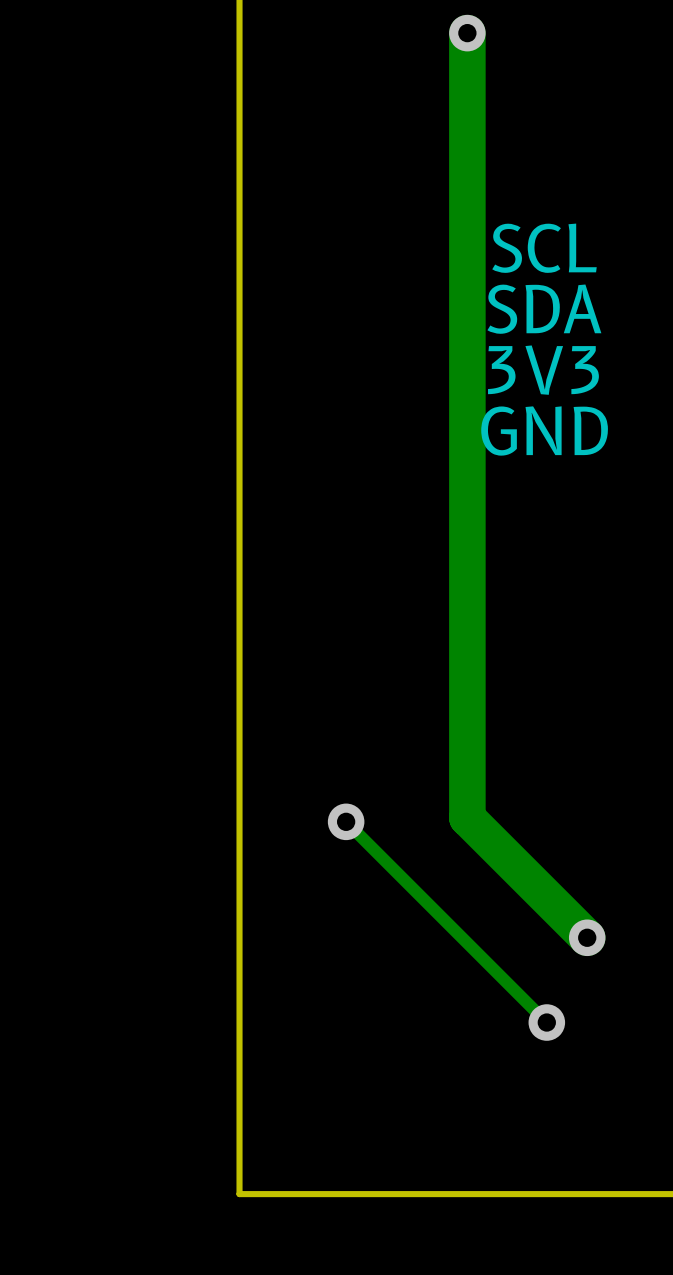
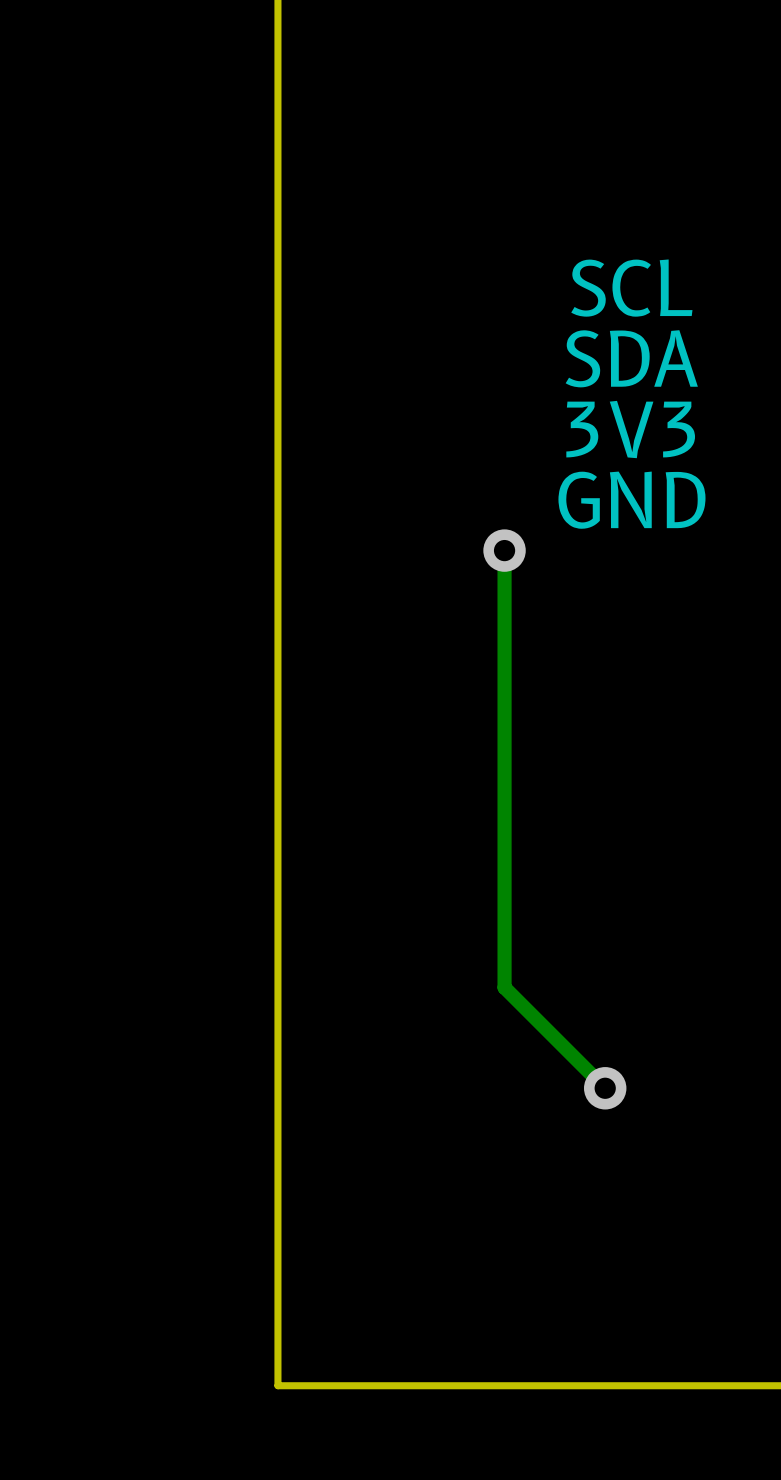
track: (467, 33) (467, 817) (587, 937) -> none
via: (467, 33) -> none
track: none -> (504, 550) (504, 987) (605, 1088)
via: none -> (504, 550)
track: (346, 821) (546, 1022) -> none
via: (346, 821) -> none
via: none -> (605, 1088)
via: (587, 937) -> none
via: (546, 1022) -> none

